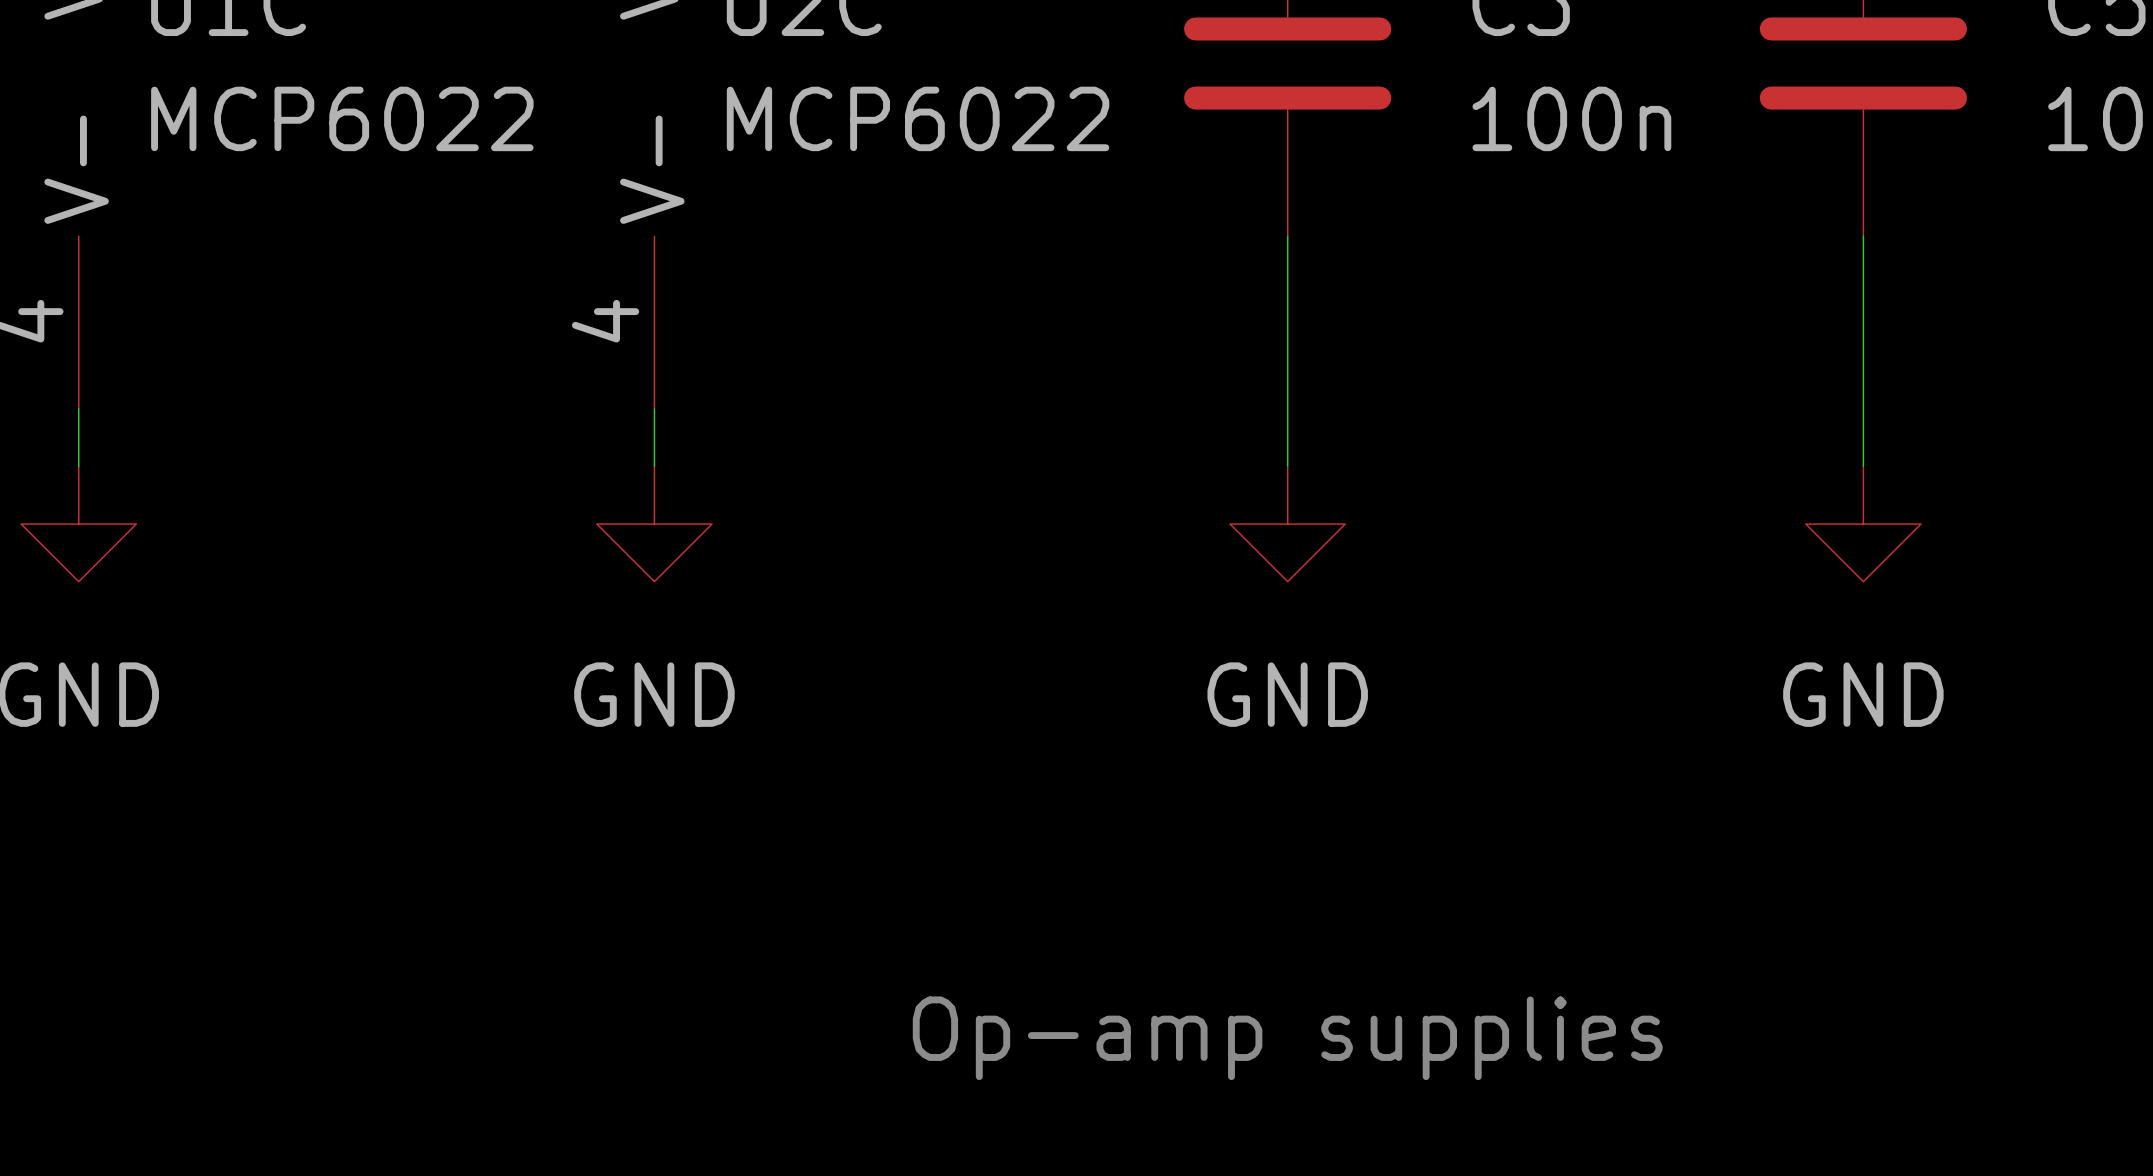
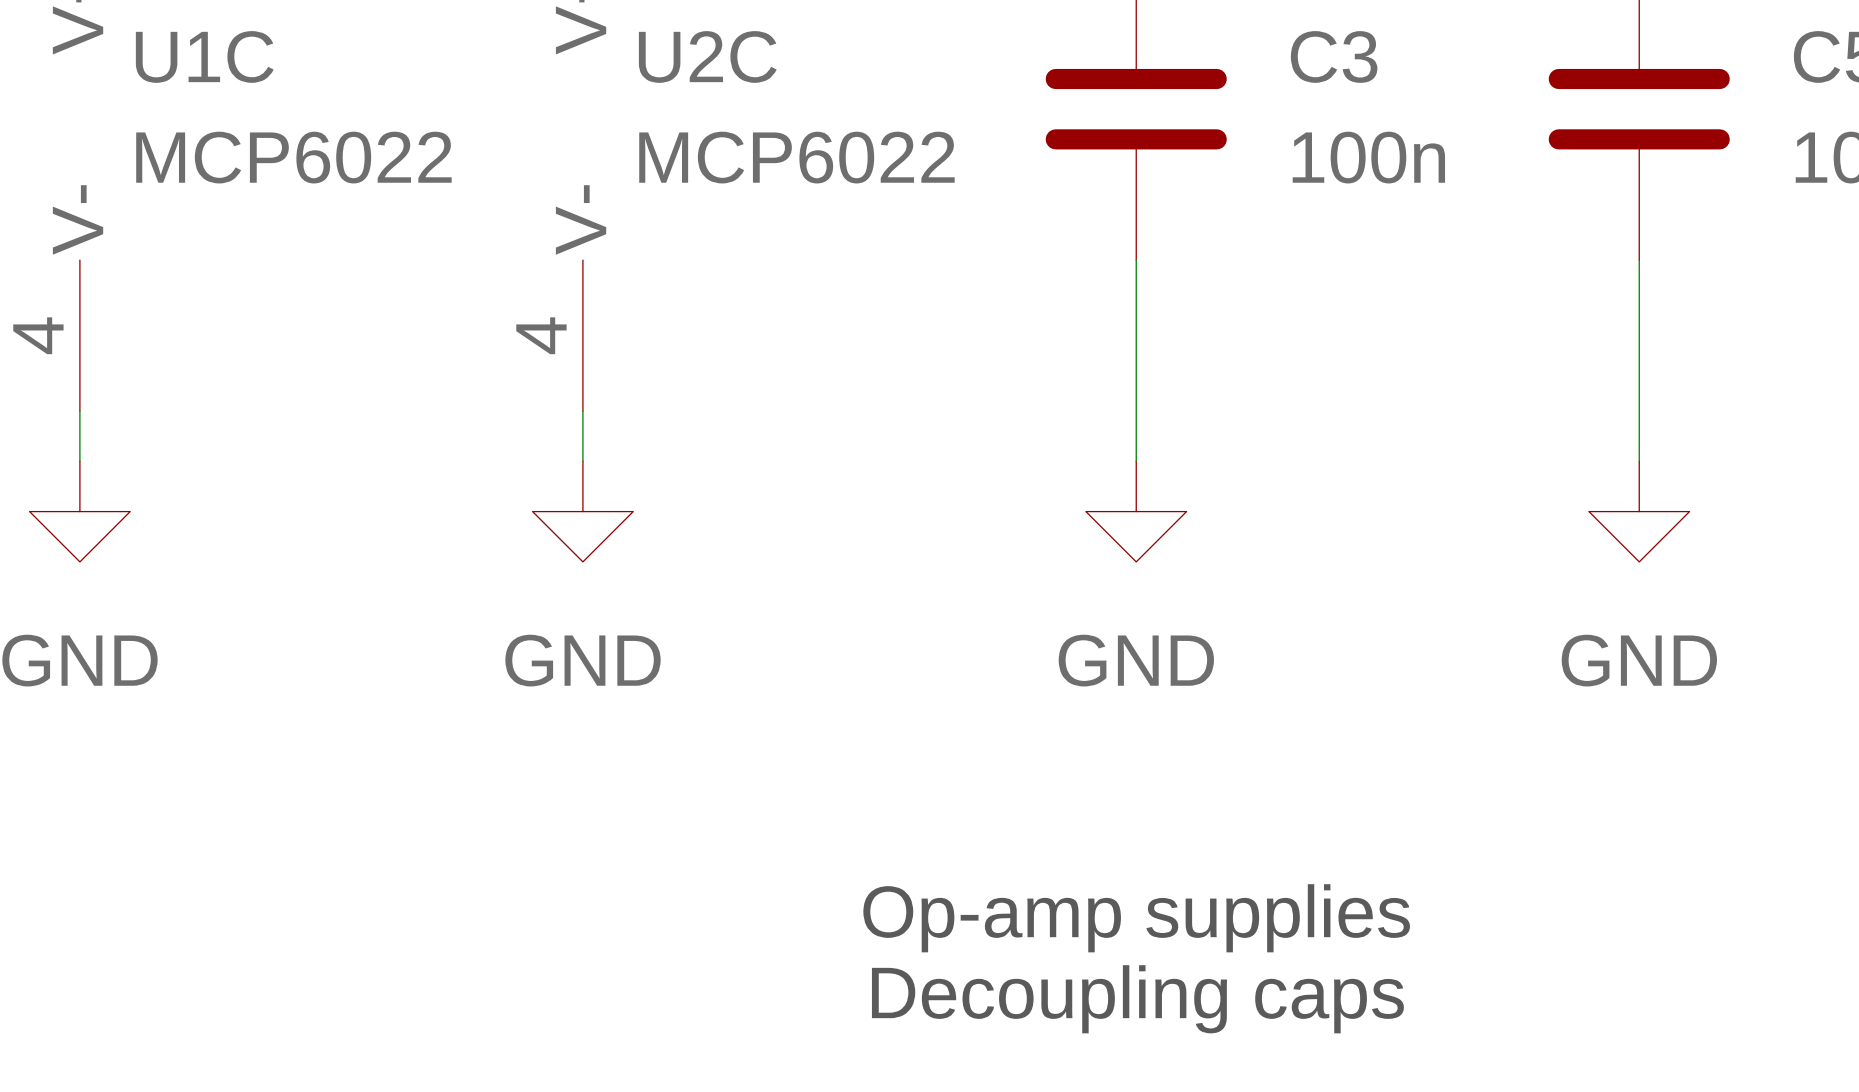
text position: Op-amp supplies (1287, 1038) -> Op-amp supplies (1136, 918)
text: none -> Decoupling caps (1137, 999)

